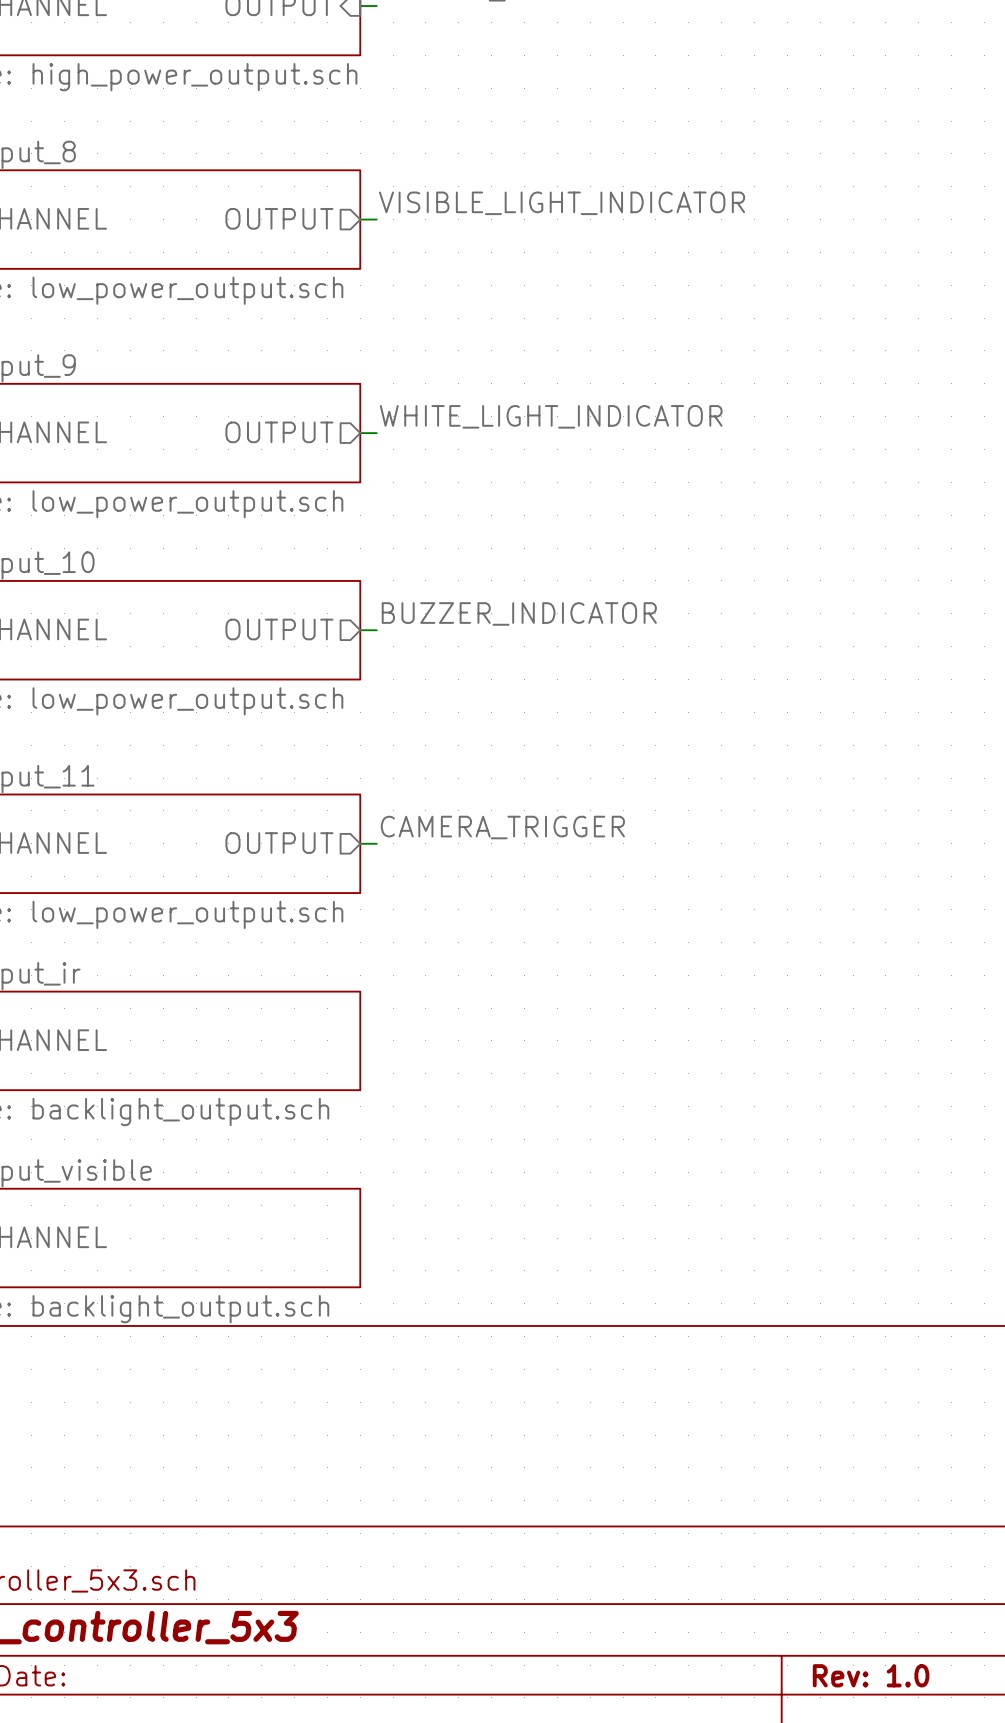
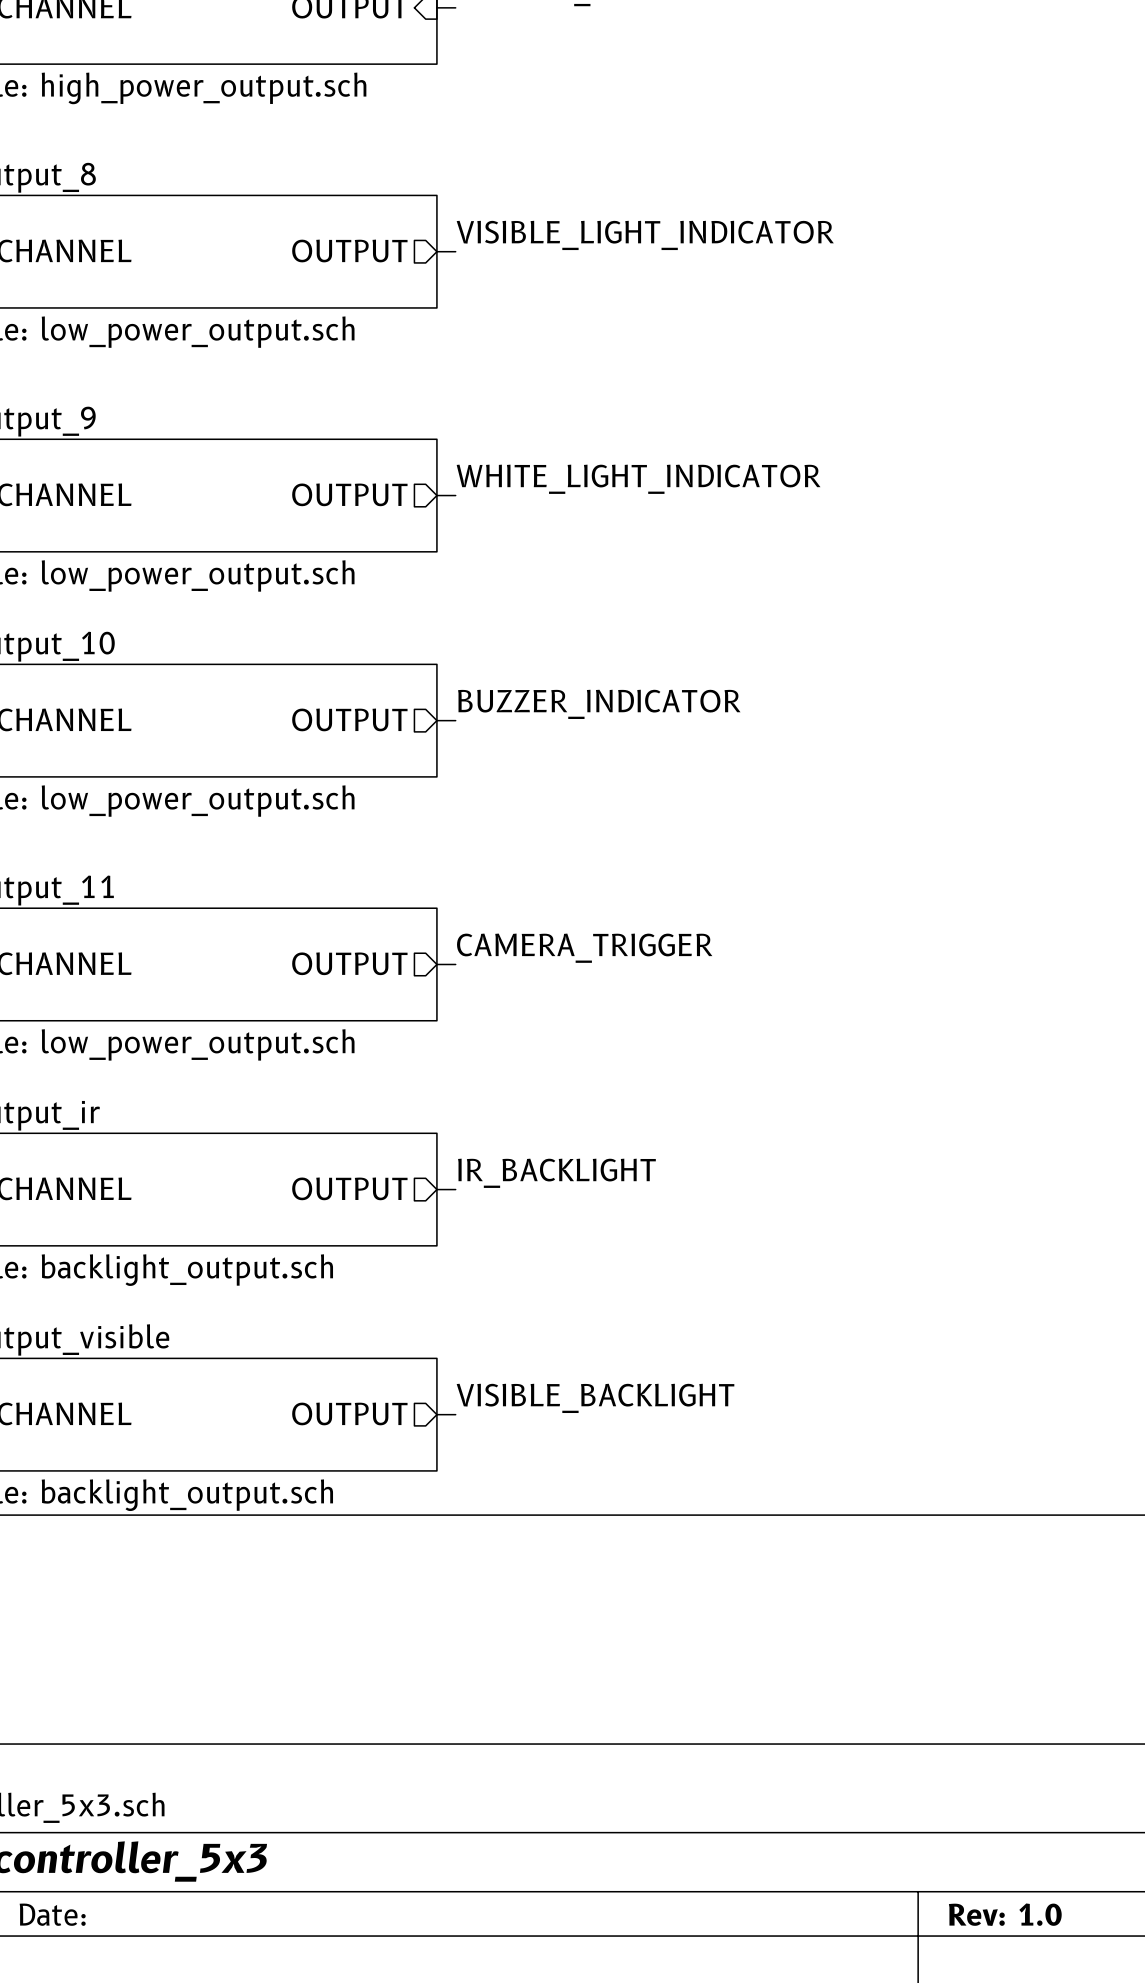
label: none -> IR_BACKLIGHT (556, 1173)
sheet pin: none -> OUTPUT (349, 1188)
wire: none -> (436, 1189) (455, 1189)
label: none -> VISIBLE_BACKLIGHT (595, 1398)
sheet pin: none -> OUTPUT (349, 1413)
wire: none -> (436, 1414) (455, 1414)

